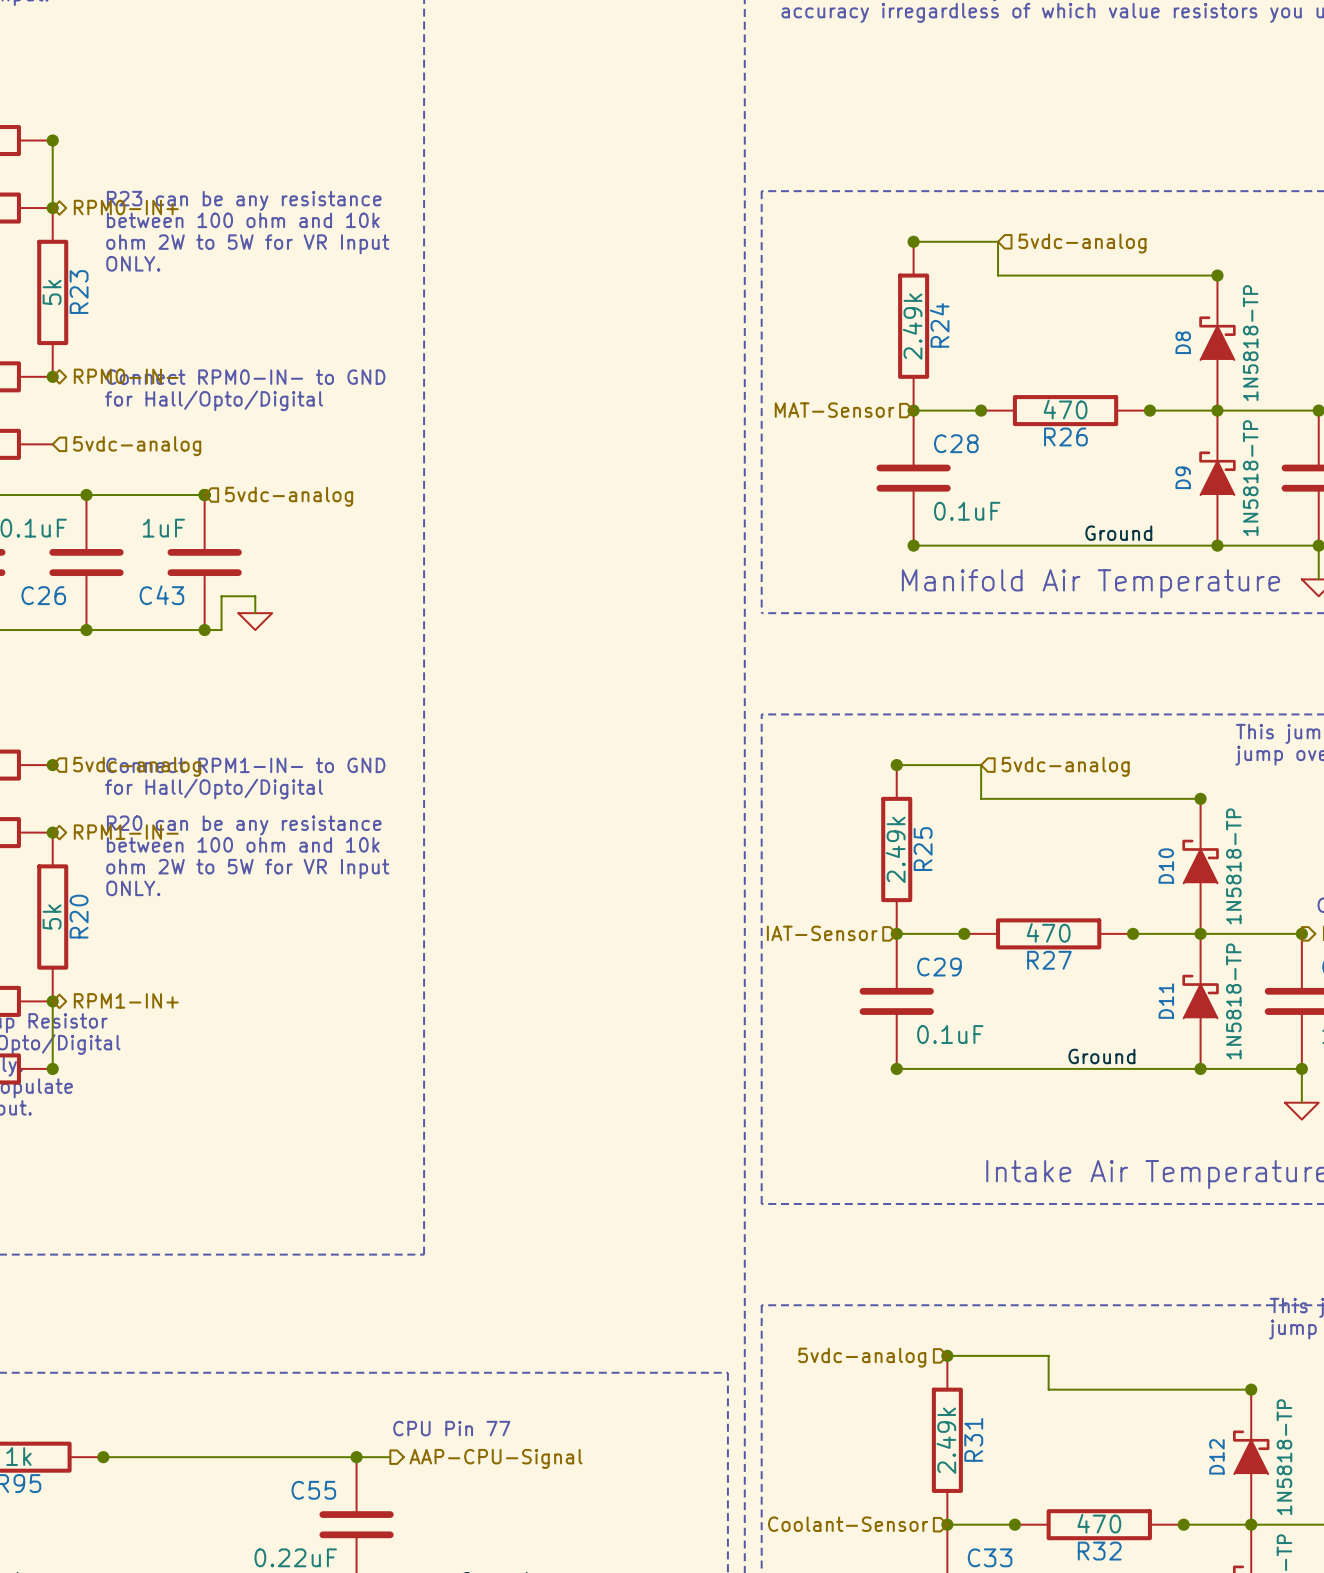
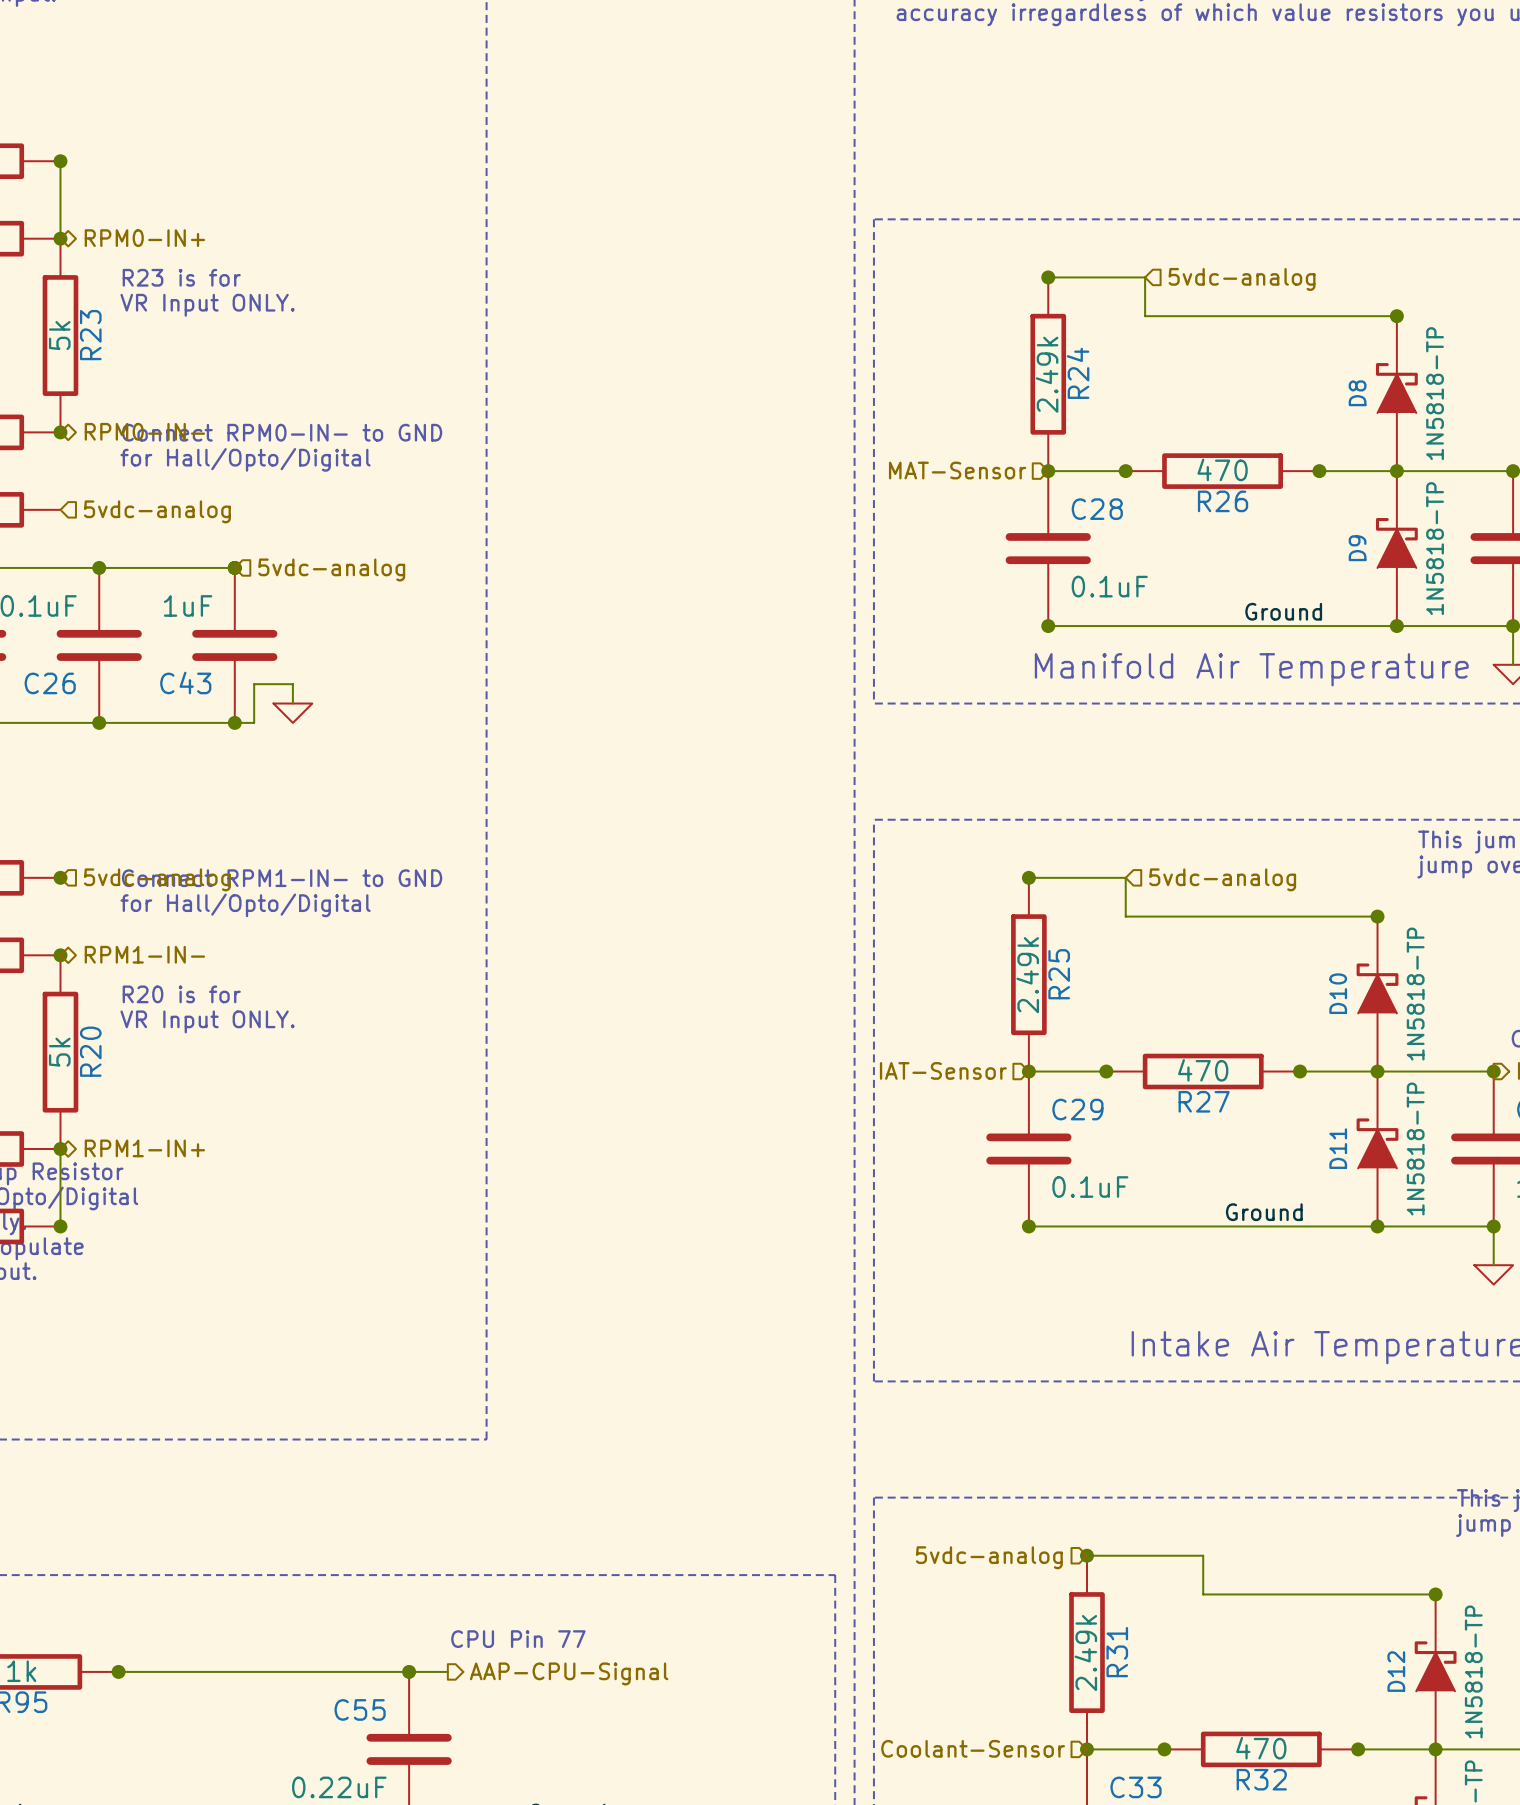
text: R23 can be any resistance (244, 200) -> none
text: between 100 ohm and 10k (243, 220) -> none
text: ohm 2W to 5W for VR Input (247, 244) -> R23 is for (181, 277)
text: ONLY. (133, 263) -> VR Input ONLY. (207, 305)
text: R20 can be any resistance (244, 825) -> none
text: between 100 ohm and 10k (243, 844) -> none
text: ohm 2W to 5W for VR Input (247, 868) -> R20 is for (181, 994)
text: ONLY. (133, 888) -> VR Input ONLY. (207, 1021)

